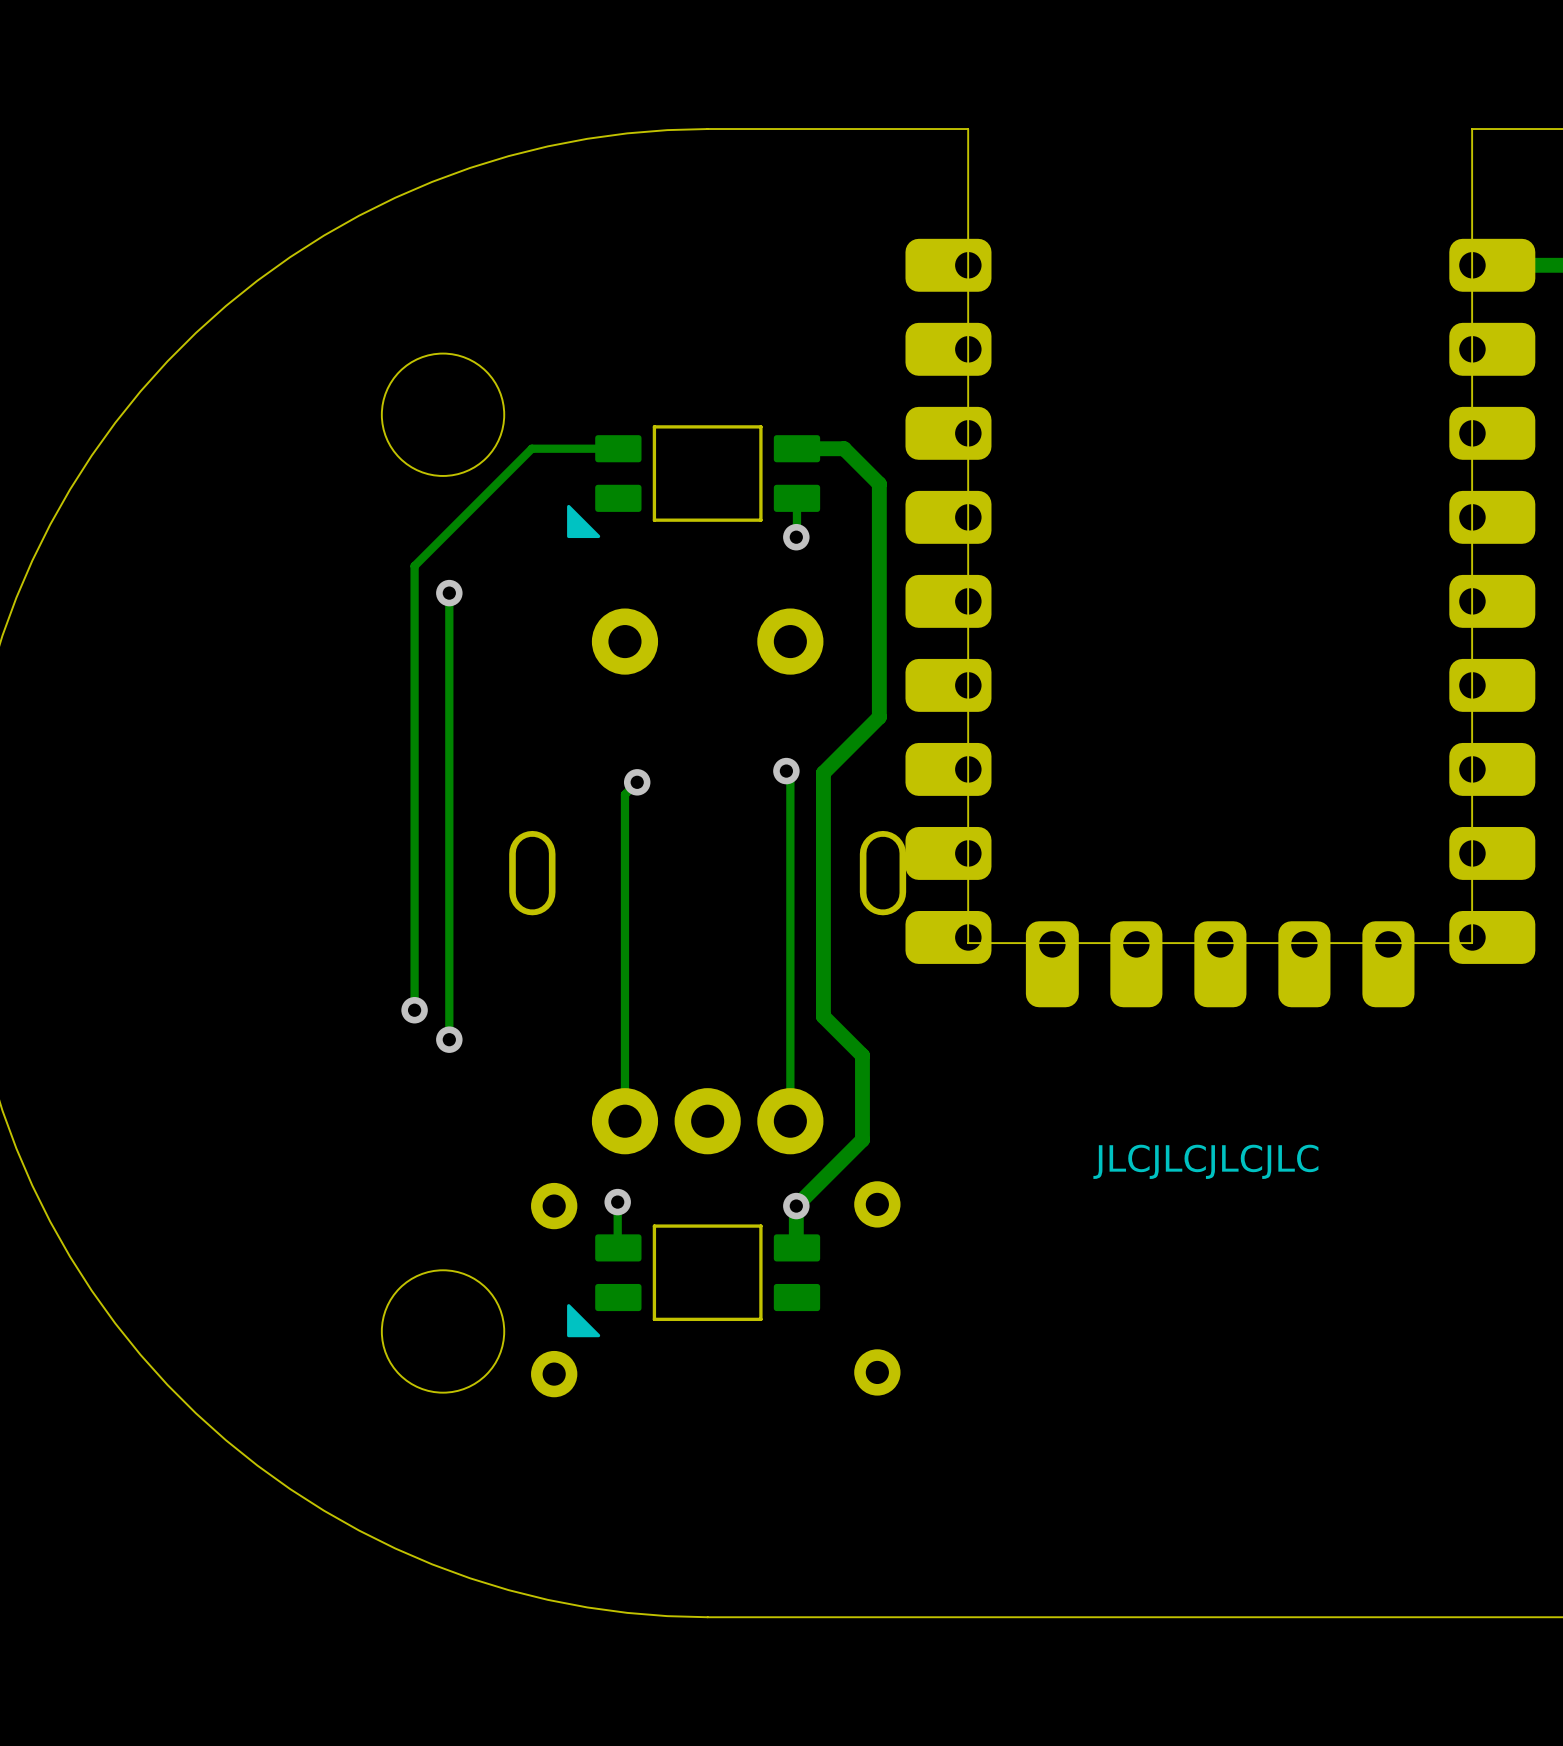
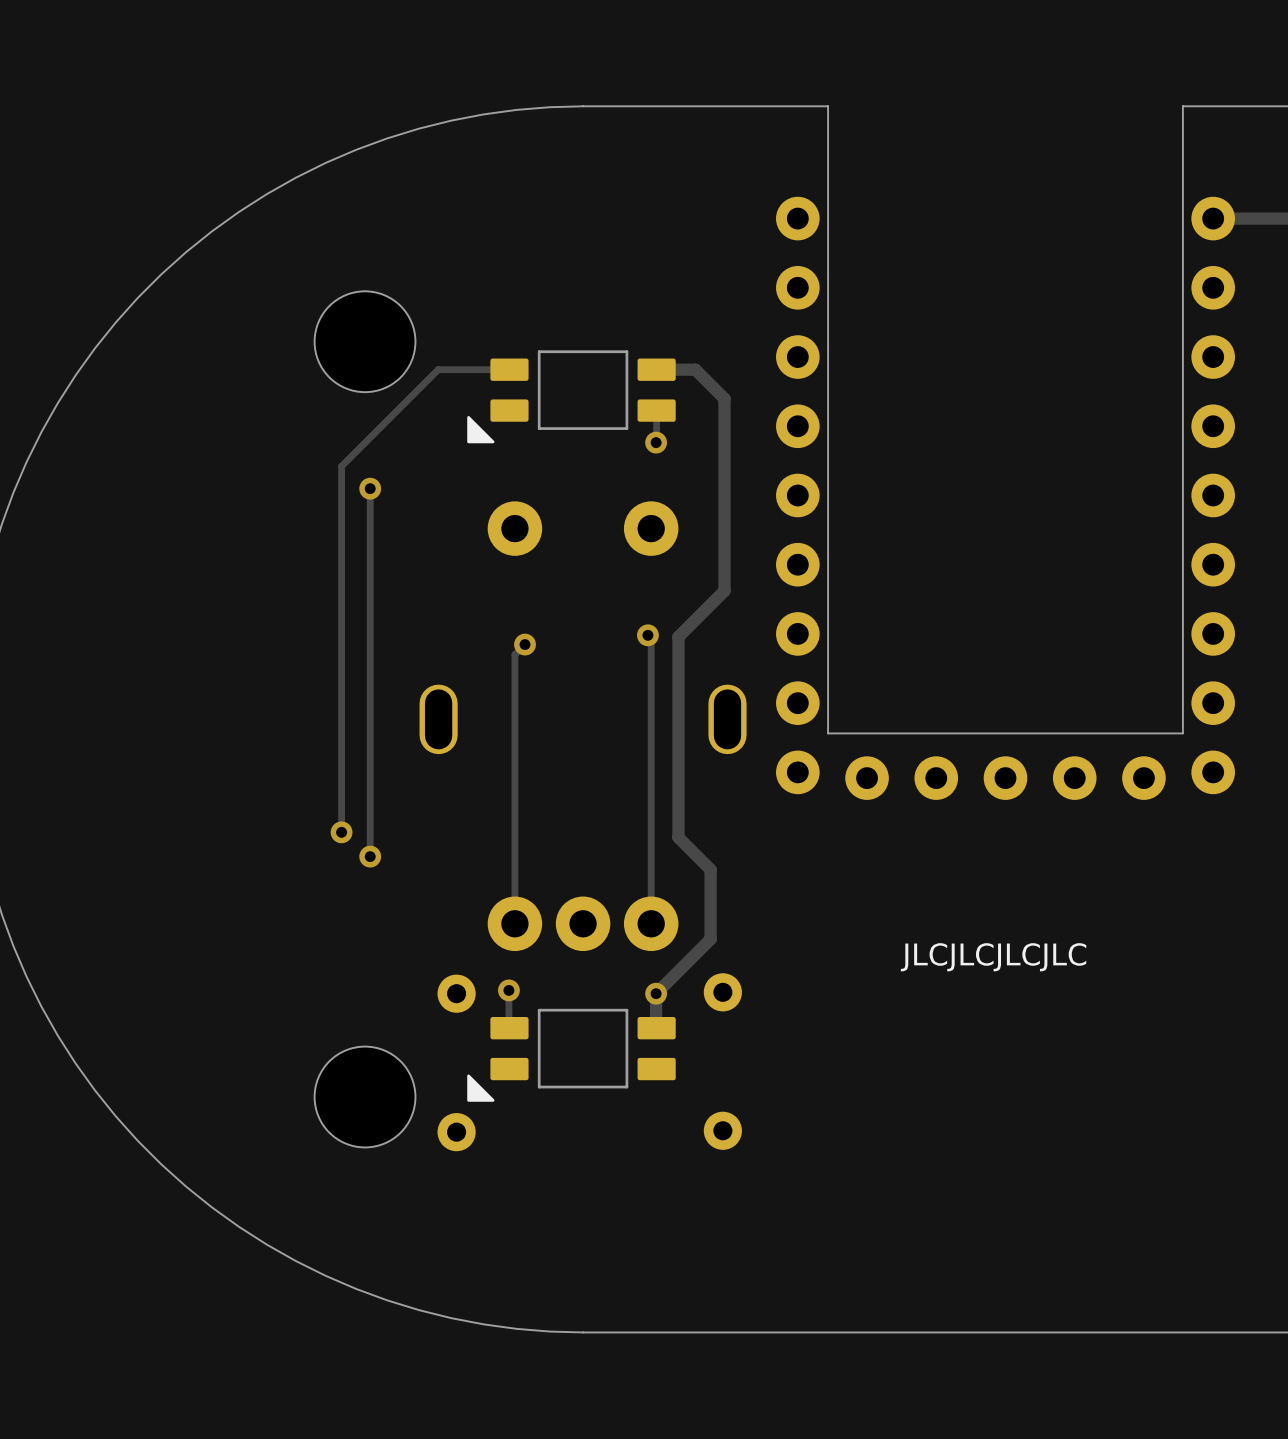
board edge: (1472, 129) (1472, 943) (968, 943) (968, 129) -> (1212, 106) (1182, 106) (1182, 733) (828, 733) (828, 106) (797, 106)
part footprint: [905, 238, 1536, 1008] -> [776, 196, 1235, 800]

